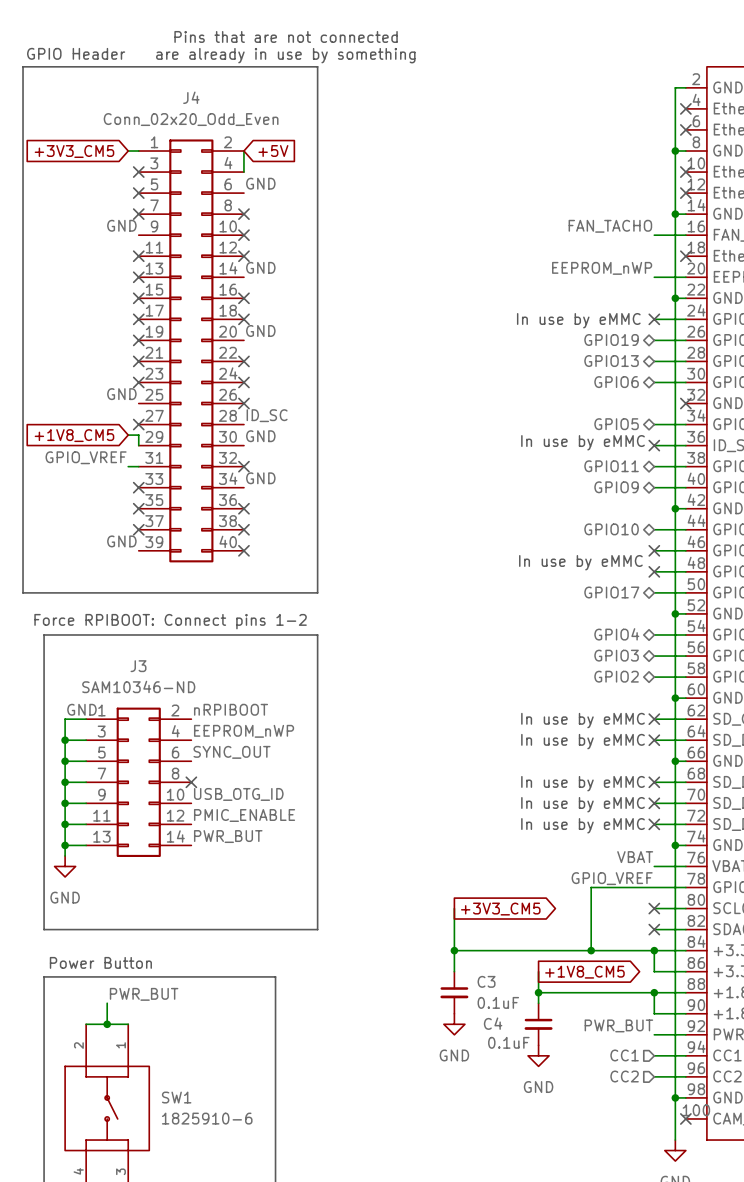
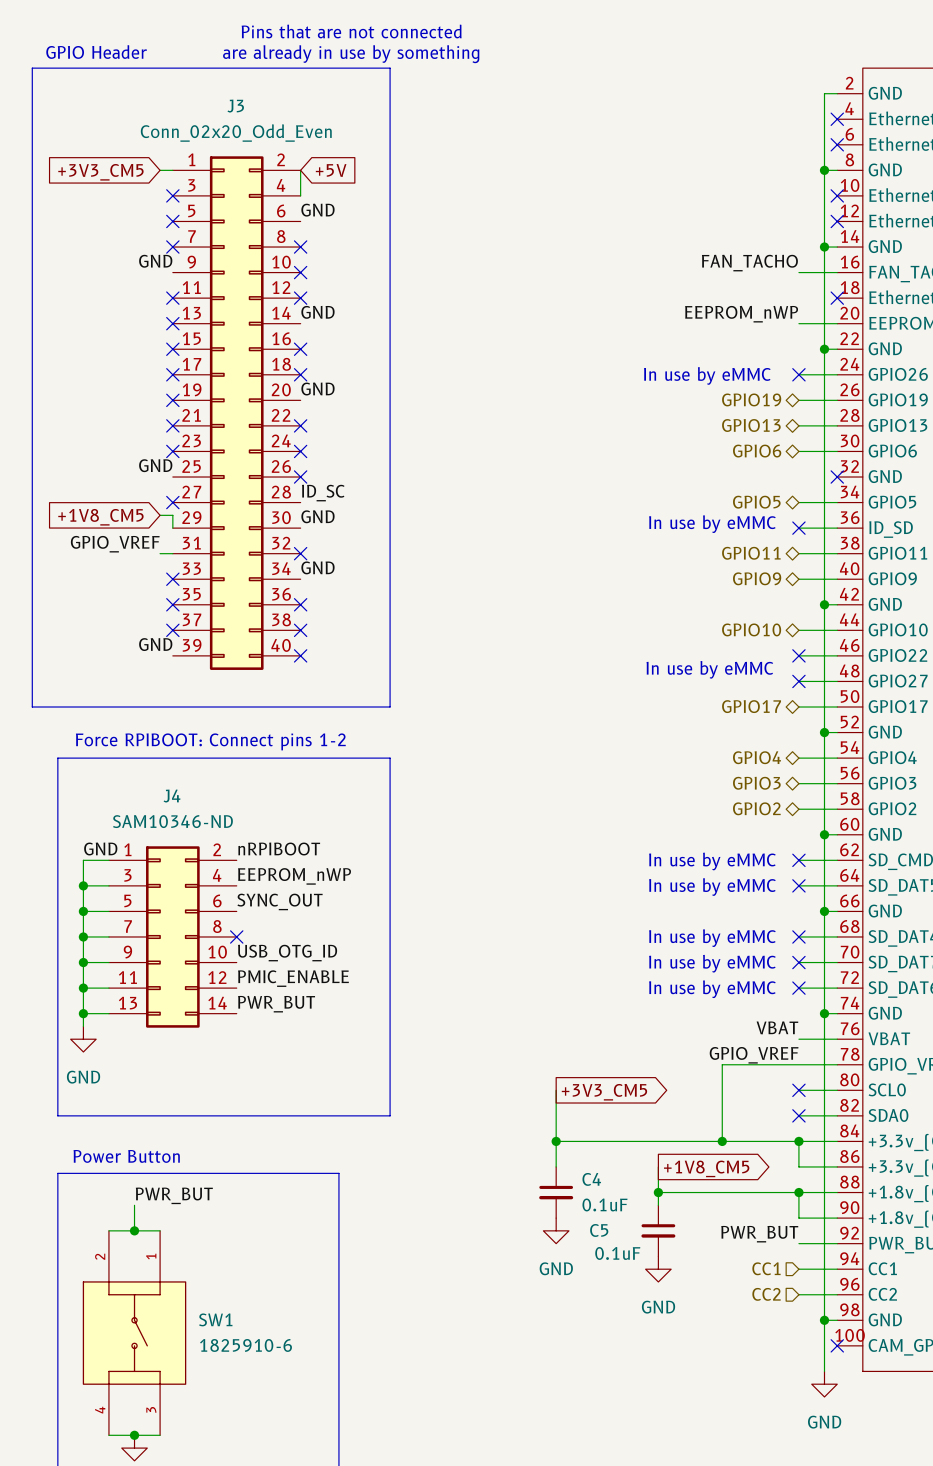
J4 name: J4 (191, 97) -> J3 (235, 106)
J3 name: J3 (138, 666) -> J4 (172, 796)
C3 name: C3 (486, 981) -> C4 (591, 1179)
C4 name: C4 (493, 1023) -> C5 (599, 1230)

